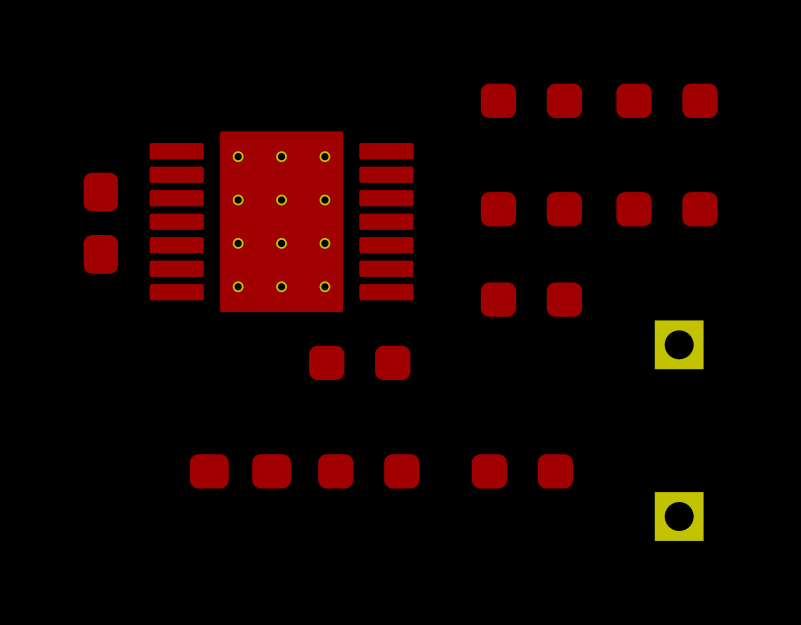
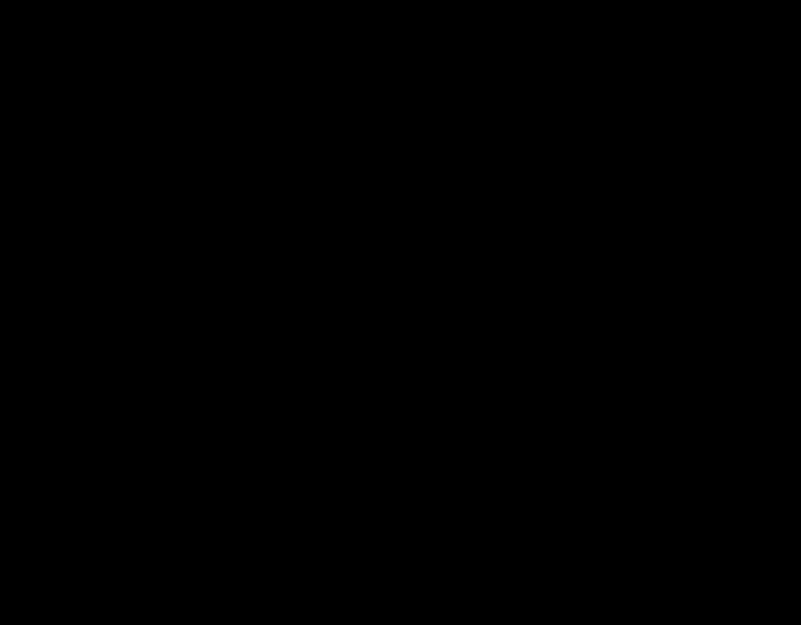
part: (531, 100) -> none
part: (666, 100) -> none
part: (531, 209) -> none
part: (666, 209) -> none
part: (281, 221) -> none
part: (100, 223) -> none
part: (531, 299) -> none
part: (679, 344) -> none
part: (359, 362) -> none
part: (240, 471) -> none
part: (368, 471) -> none
part: (522, 471) -> none
part: (679, 516) -> none

